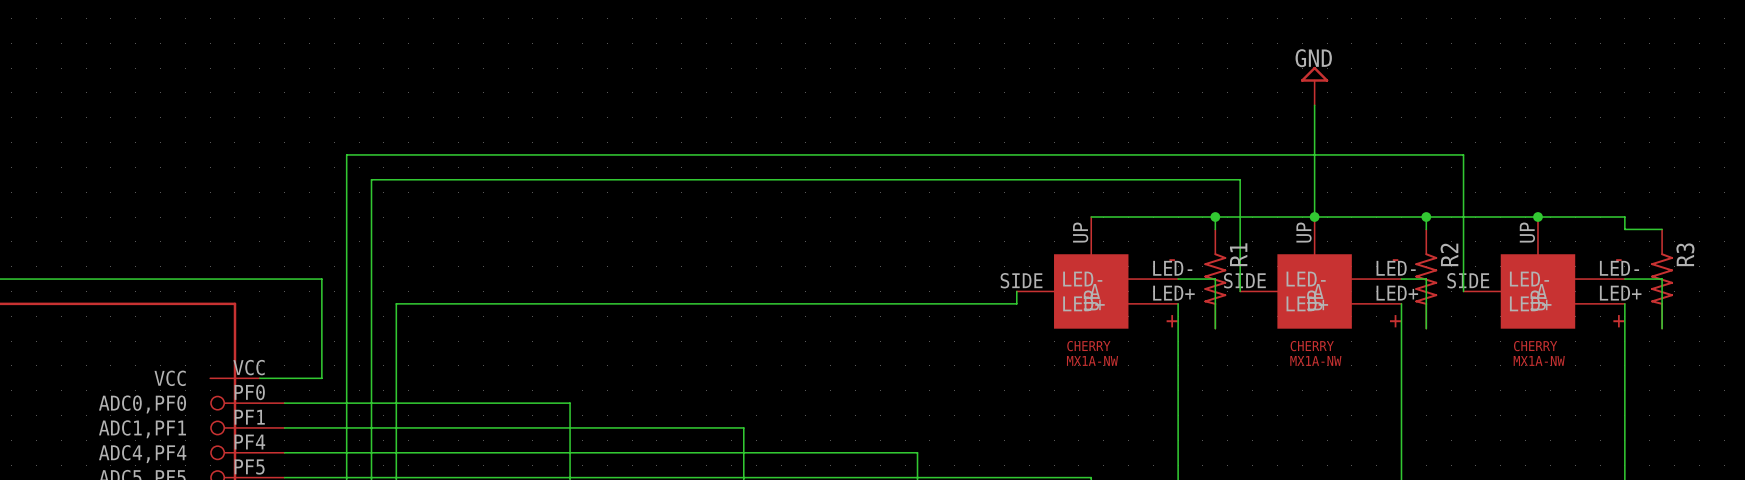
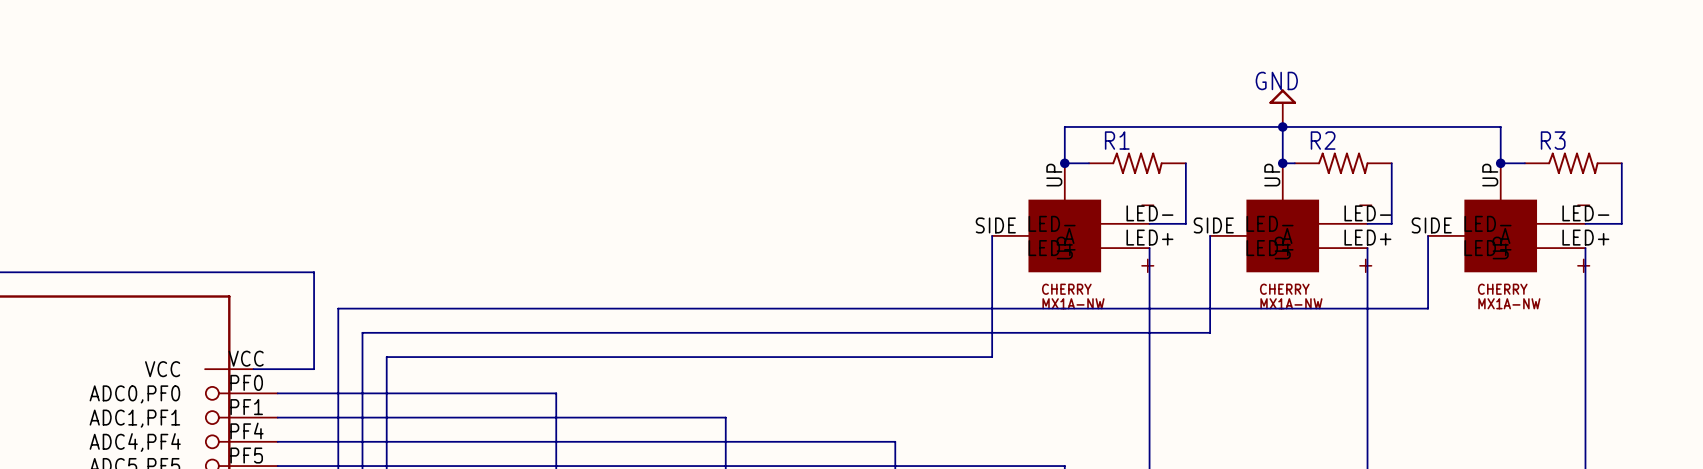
power symbol position: GND (1314, 86) -> GND (1282, 108)
junction: none -> (1282, 126)
junction: none -> (1064, 163)
wire: none -> (1089, 163) (1064, 163) (1064, 126) (1500, 126) (1500, 163) (1524, 163)
wire: none -> (1185, 163) (1185, 211)
junction: none -> (1282, 163)
wire: none -> (1391, 163) (1391, 211)
wire: none -> (1621, 163) (1621, 223)
wire: (1091, 217) (1624, 217) (1624, 229) -> none
junction: (1215, 217) -> none
junction: (1314, 217) -> none
junction: (1426, 217) -> none
junction position: (1537, 217) -> (1500, 163)
wire: none -> (1149, 223) (1185, 223)
wire: none -> (1367, 223) (1391, 223)
wire: none -> (992, 235) (992, 284)
wire: (1240, 241) (1240, 179) (371, 179) (371, 341) -> (1210, 284) (1210, 332) (362, 332)
wire: (1463, 241) (1463, 154) (346, 154) (346, 316) -> (1428, 284) (1428, 308) (338, 308)
part position: (1097, 272) -> (1070, 217)
part position: (1320, 272) -> (1288, 217)
part position: (1544, 272) -> (1506, 217)
wire: (1178, 279) (1215, 279) (1215, 328) -> none
R1 rotation: 0° (1215, 279) -> 90° counterclockwise (1137, 163)
R1 position: (1215, 279) -> (1137, 163)
wire: (1401, 279) (1426, 279) (1426, 328) -> none
R2 rotation: 0° (1426, 279) -> 90° counterclockwise (1343, 163)
R2 position: (1426, 279) -> (1343, 163)
wire: (1624, 279) (1662, 279) (1662, 328) -> none
R3 rotation: 0° (1662, 279) -> 90° counterclockwise (1573, 163)
R3 position: (1662, 279) -> (1573, 163)
wire: (1016, 303) (396, 303) (396, 365) -> (992, 296) (992, 357) (386, 357)

